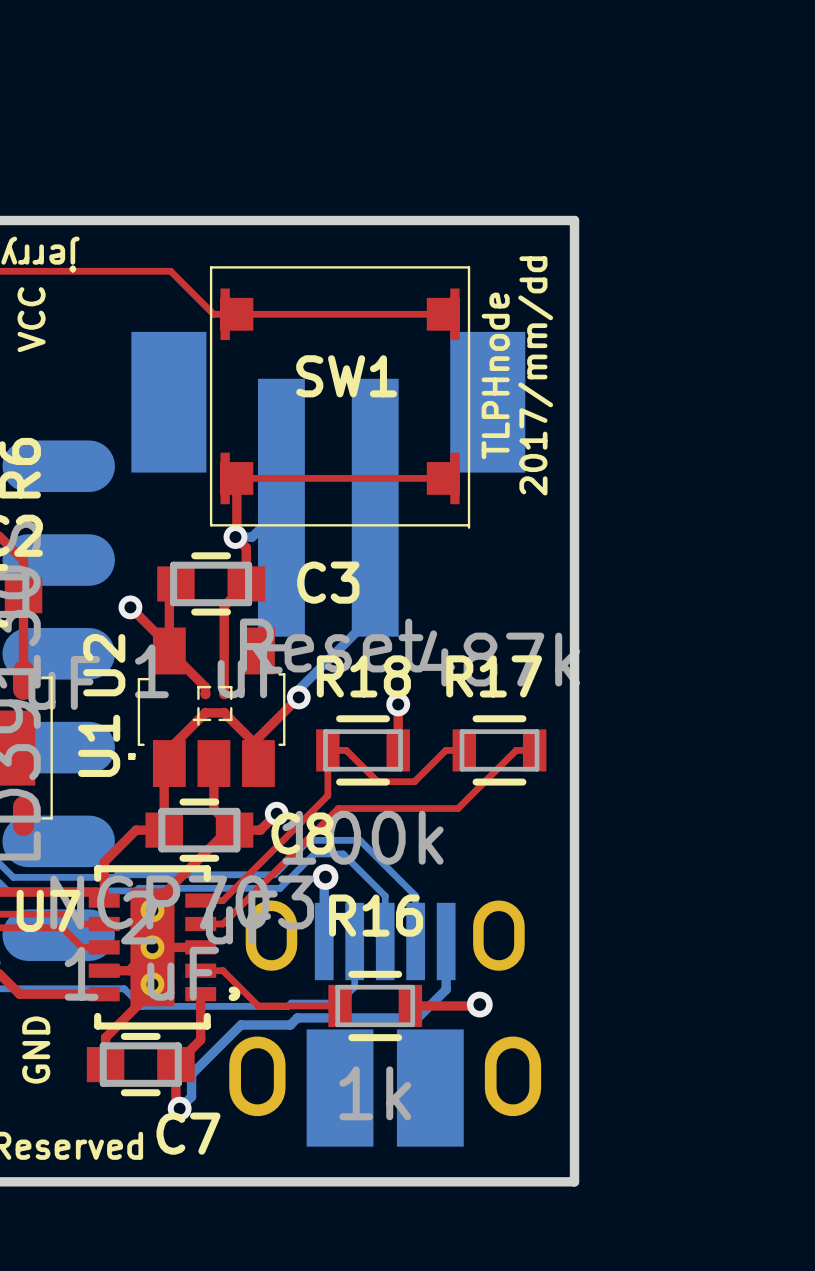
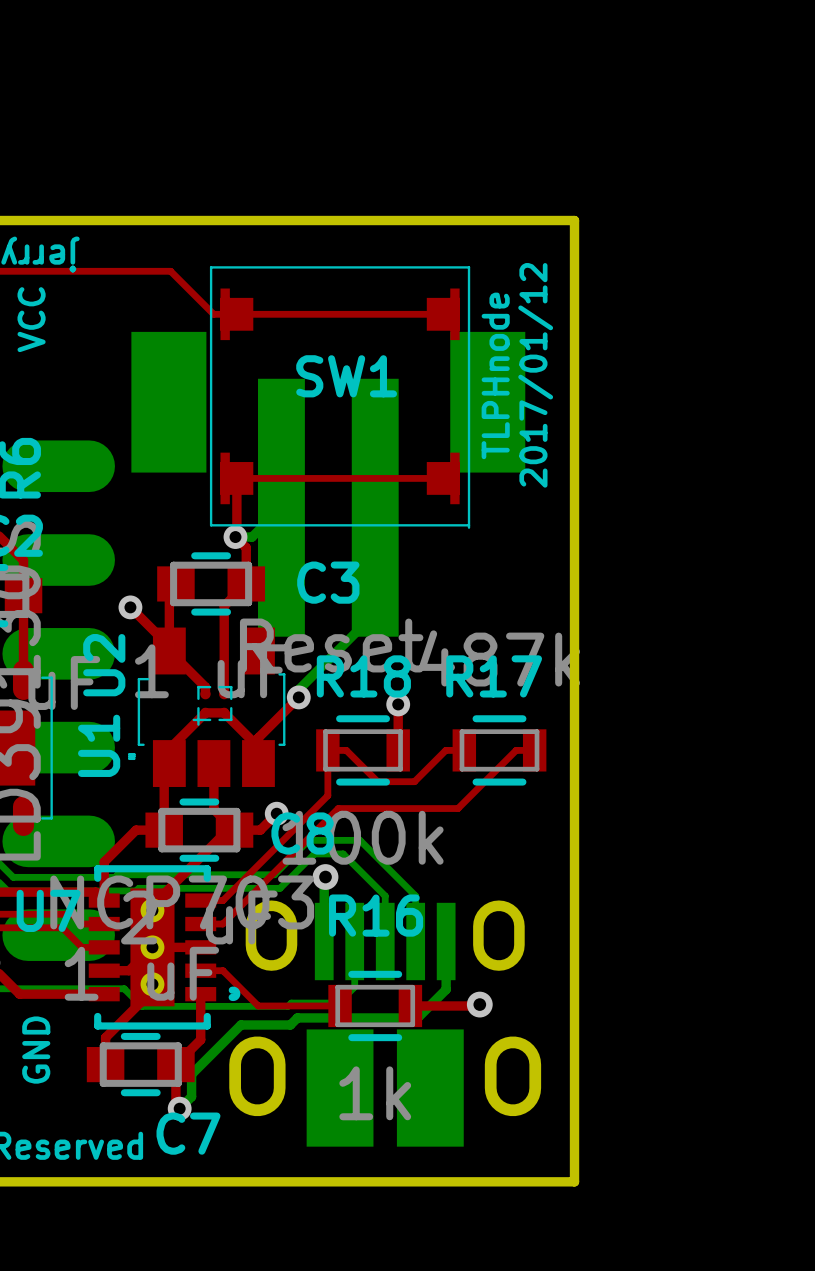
text: 2017/mm/dd (535, 375) -> 2017/01/12 (535, 375)

